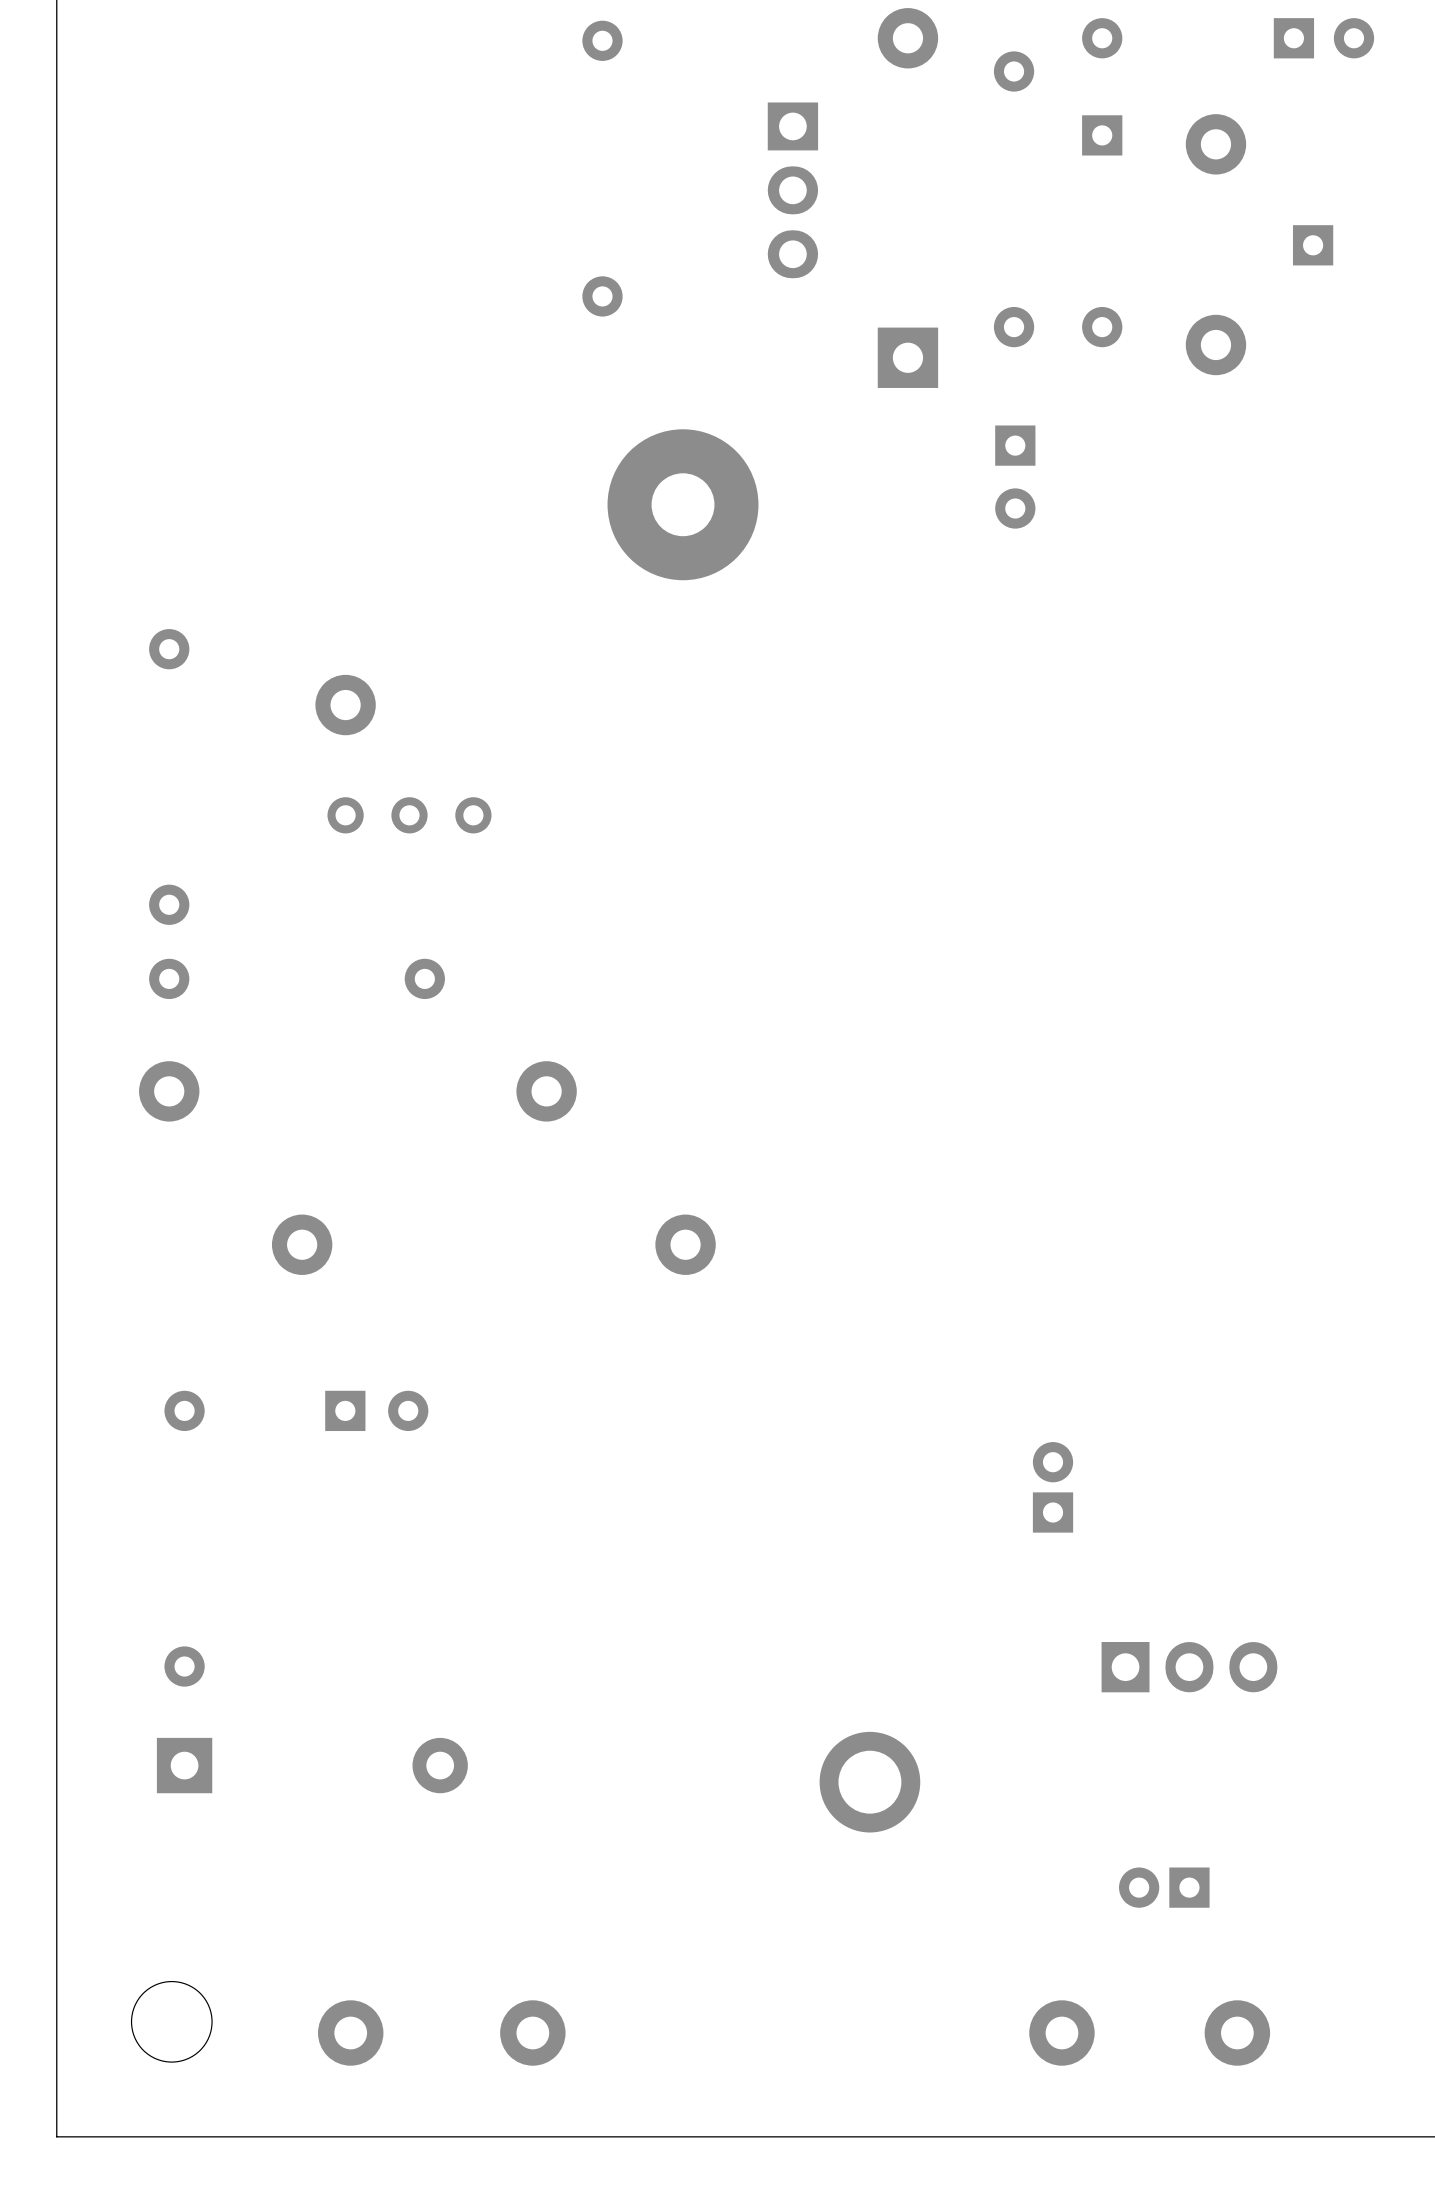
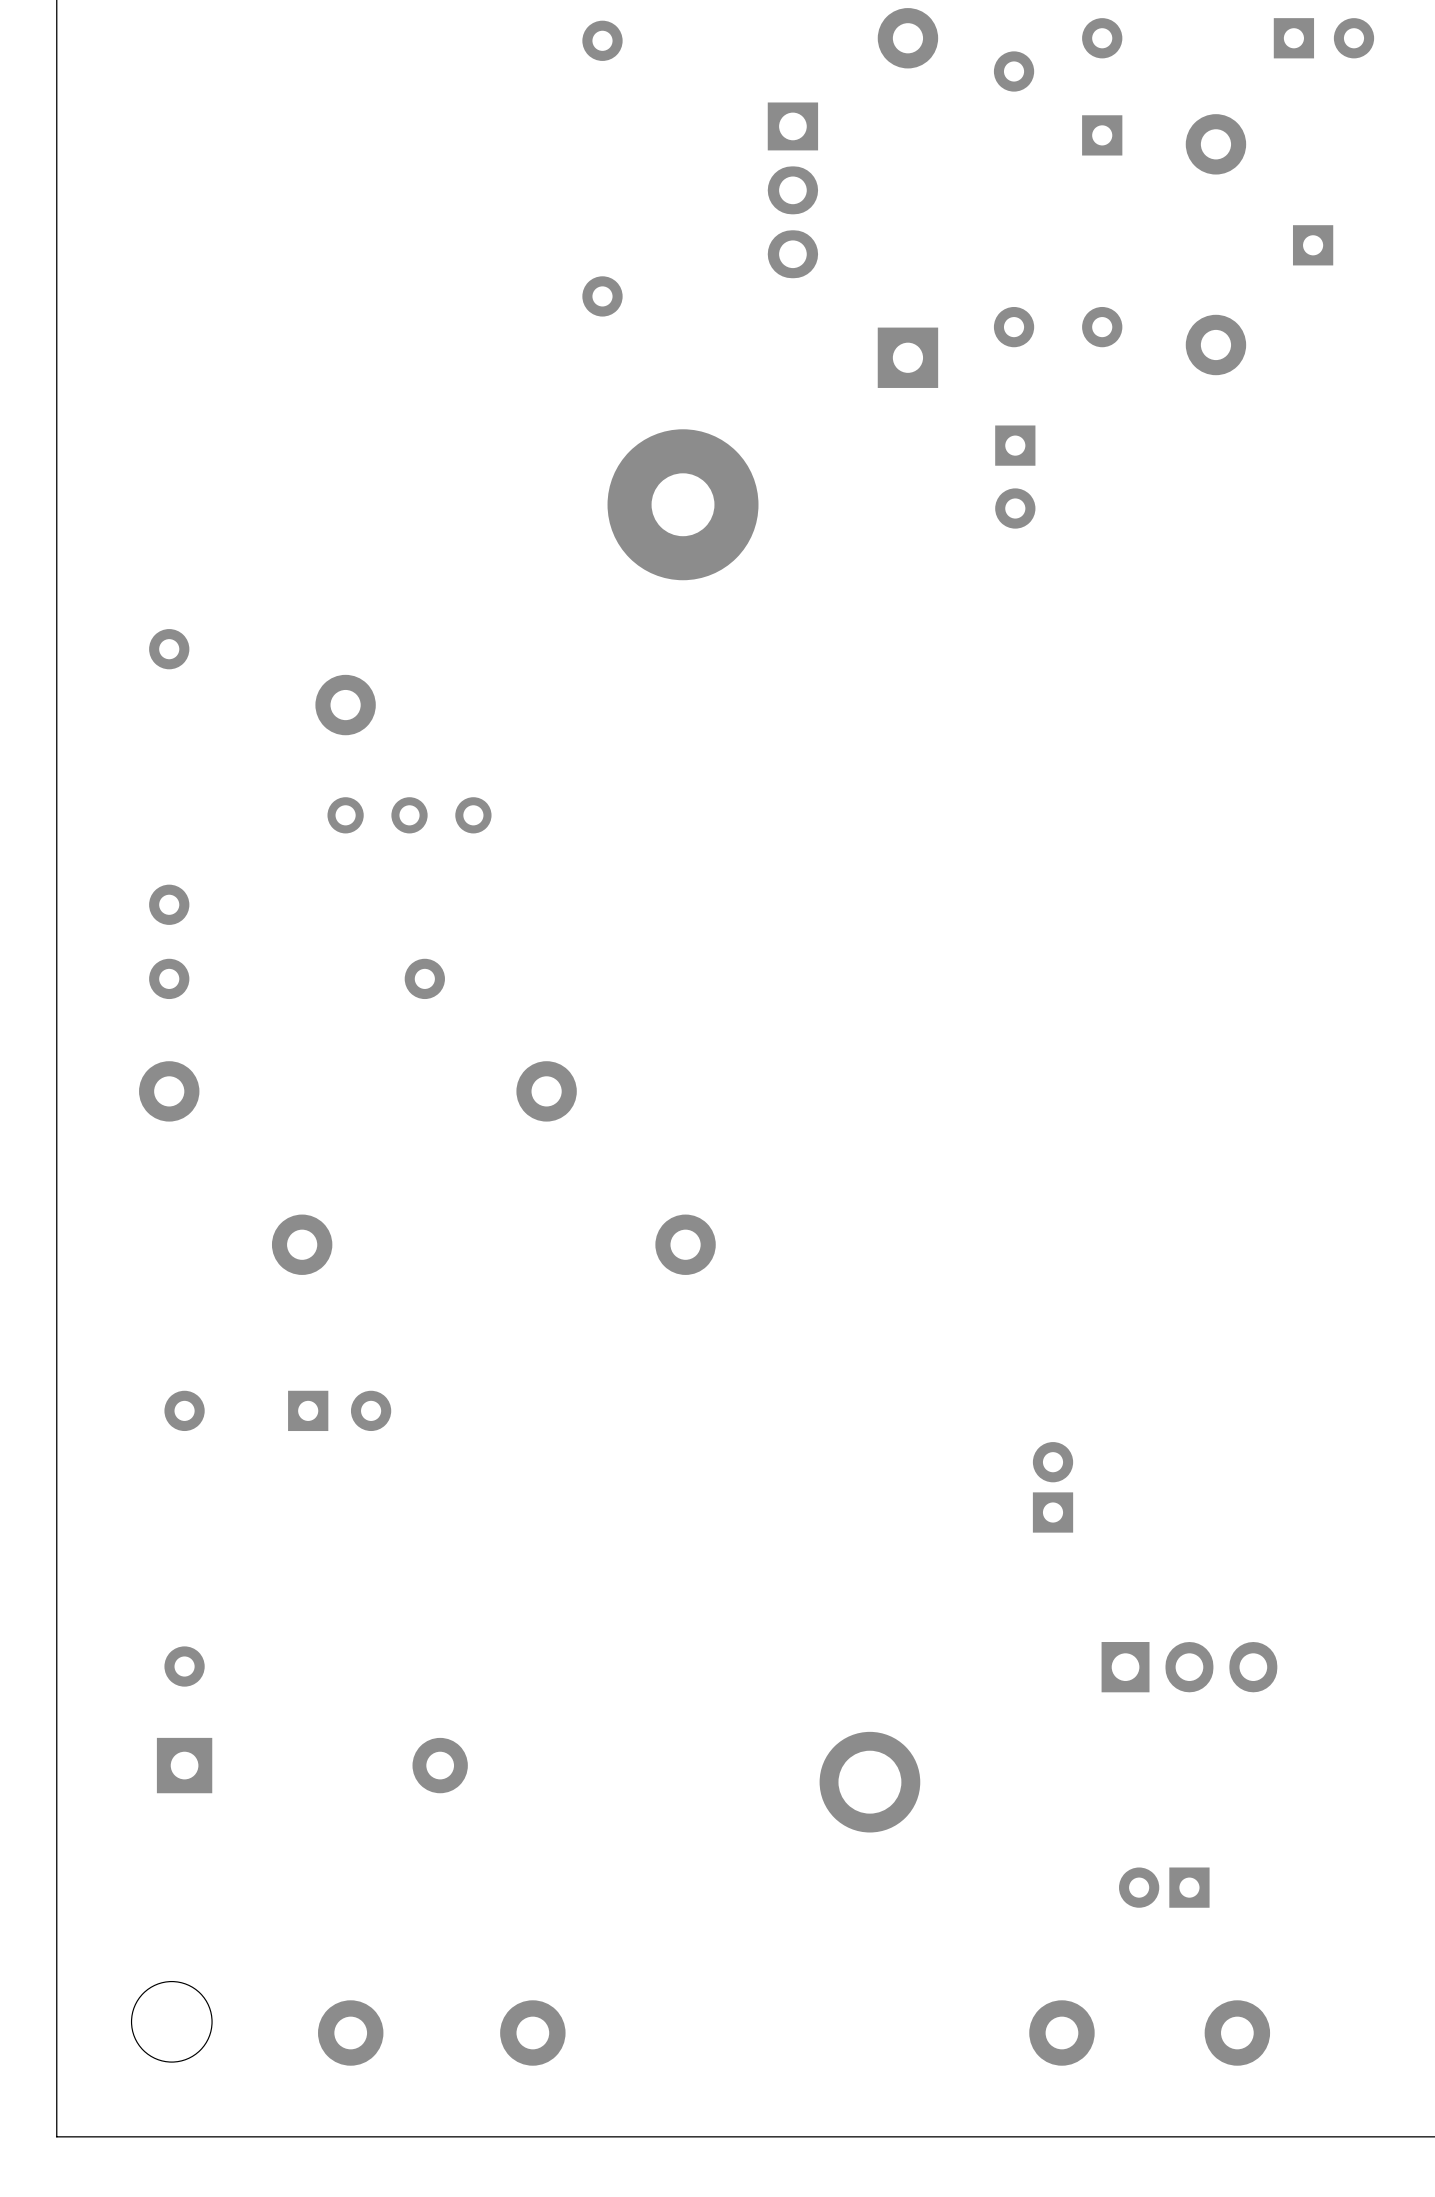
part position: (376, 1410) -> (339, 1410)

